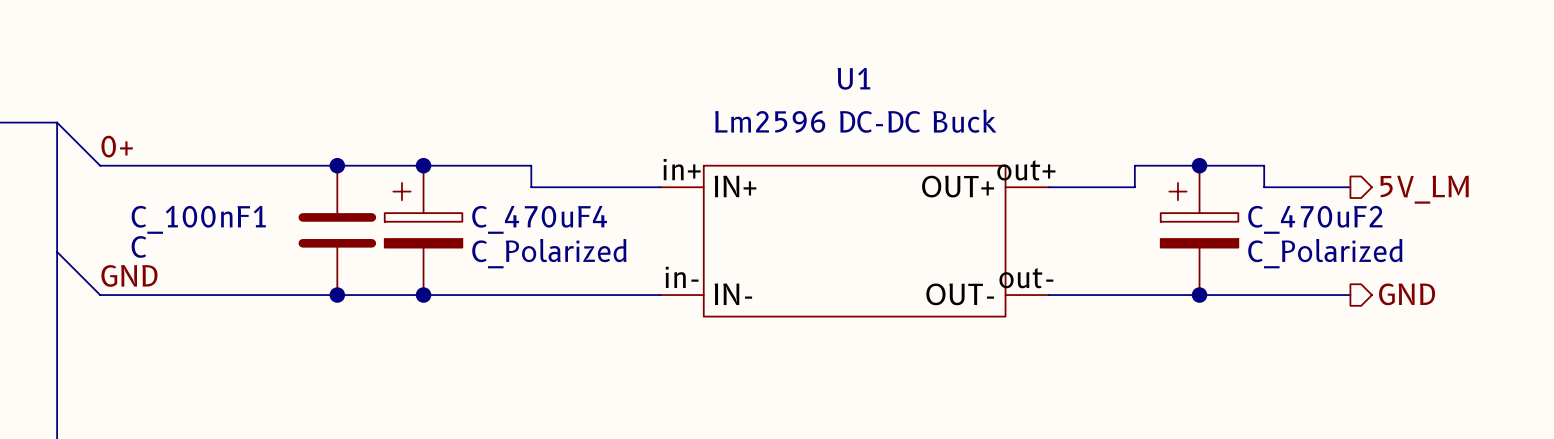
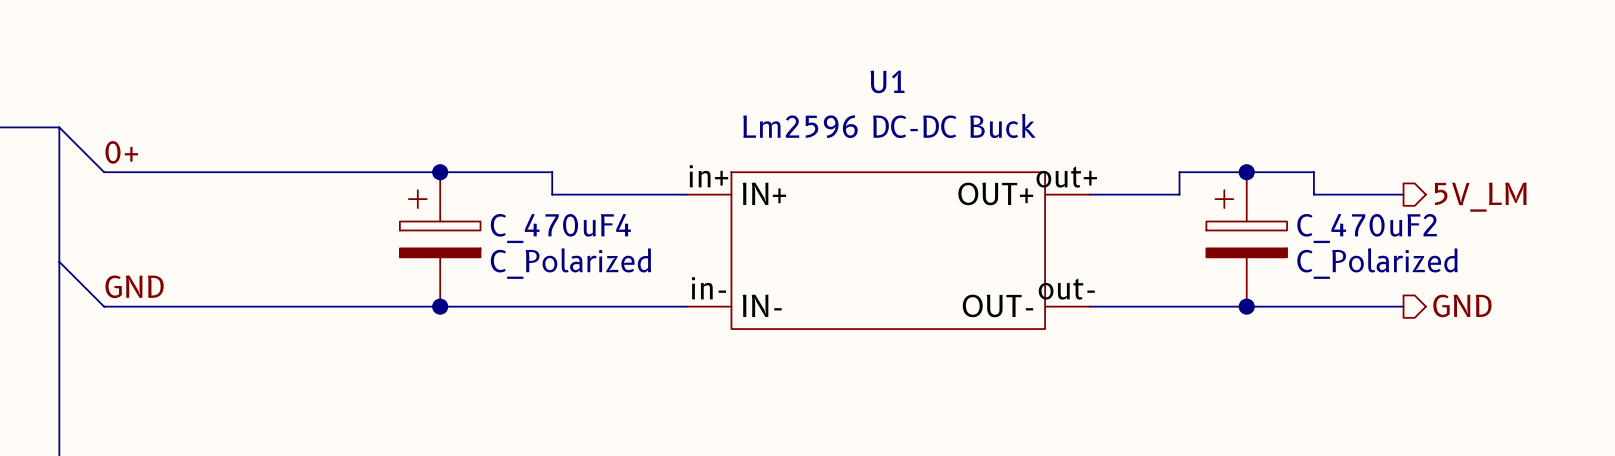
junction: (337, 165) -> none
C_100nF1: C (337, 230) -> none
junction: (337, 295) -> none

